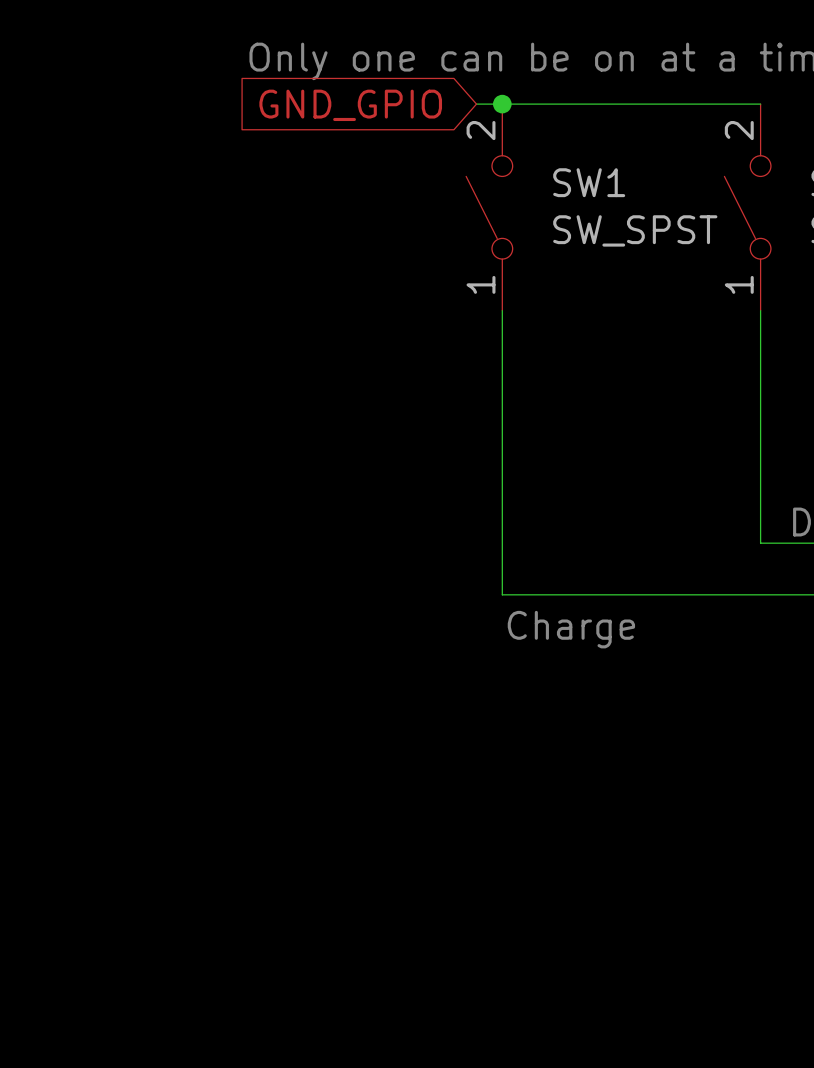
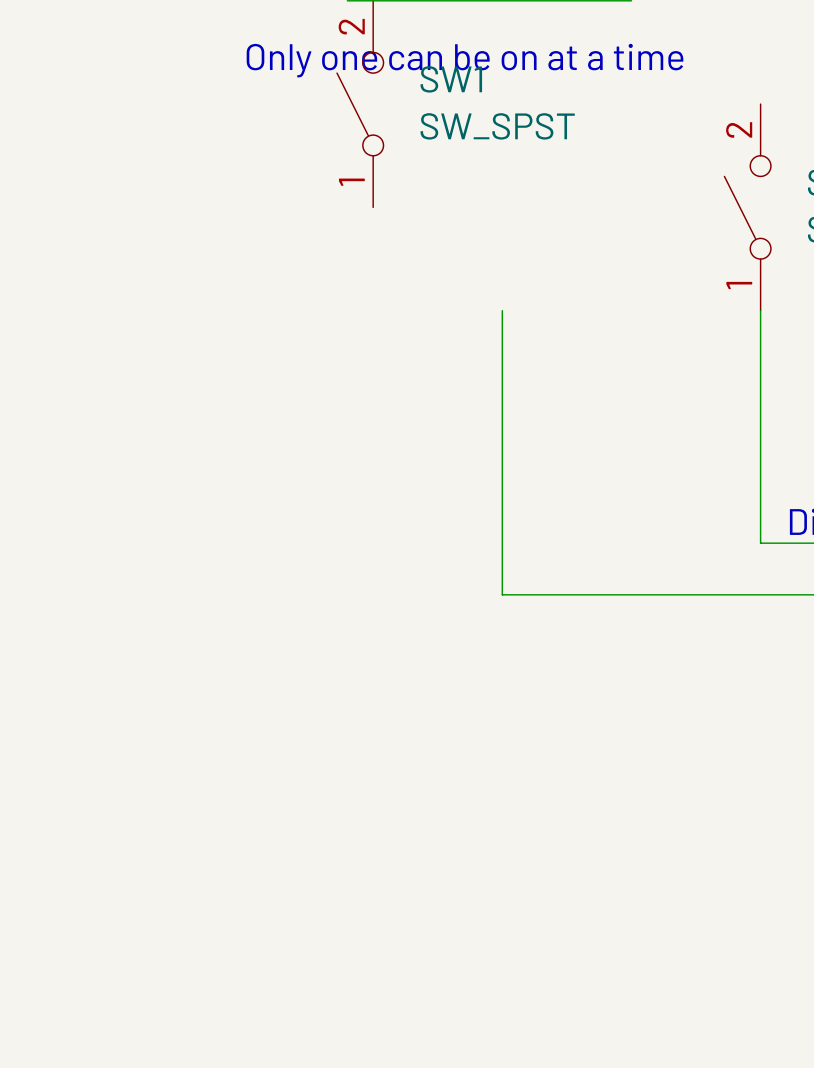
wire: (476, 104) (760, 104) -> (347, 0) (631, 0)
junction: (502, 104) -> none
global label: GND_GPIO (350, 105) -> none
SW1 position: (489, 207) -> (360, 104)
text: Charge (571, 629) -> none

